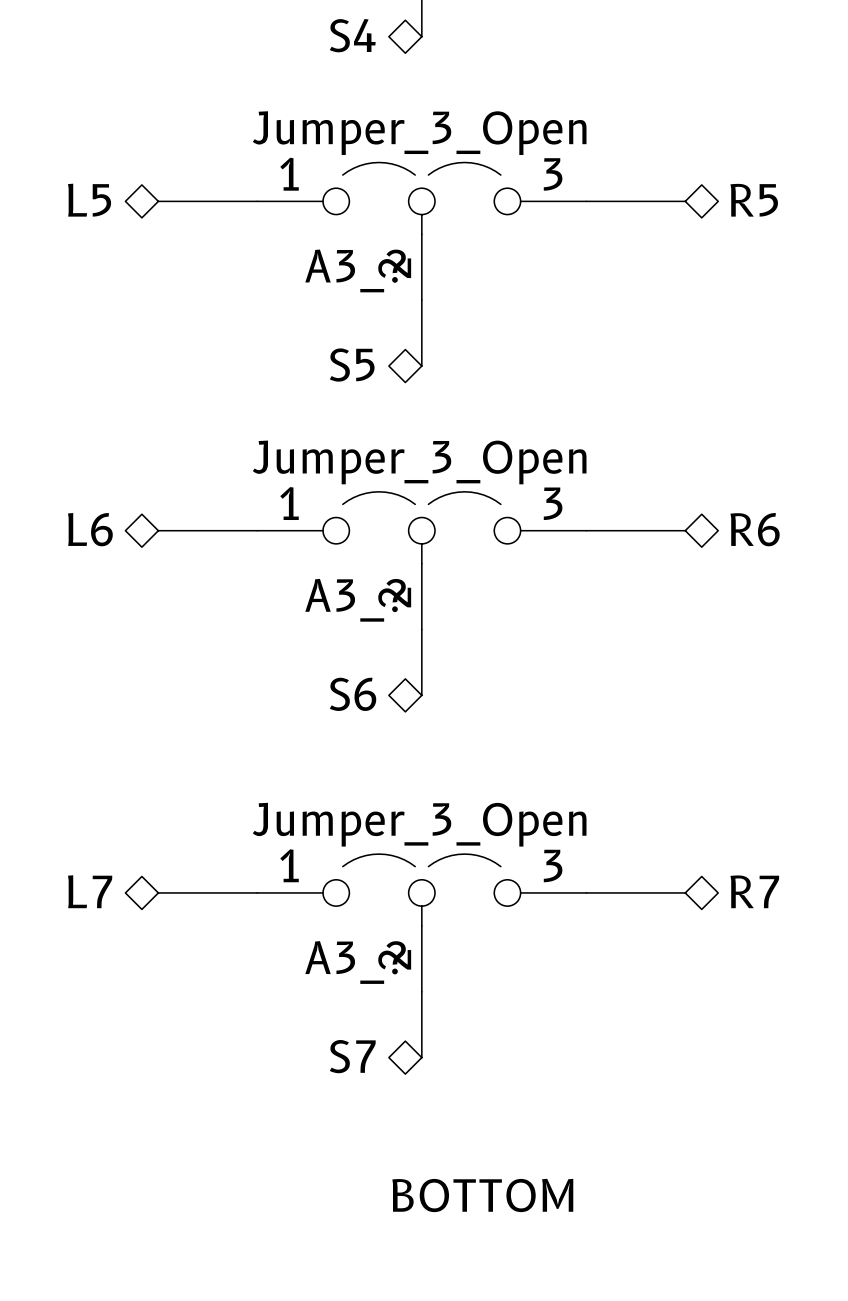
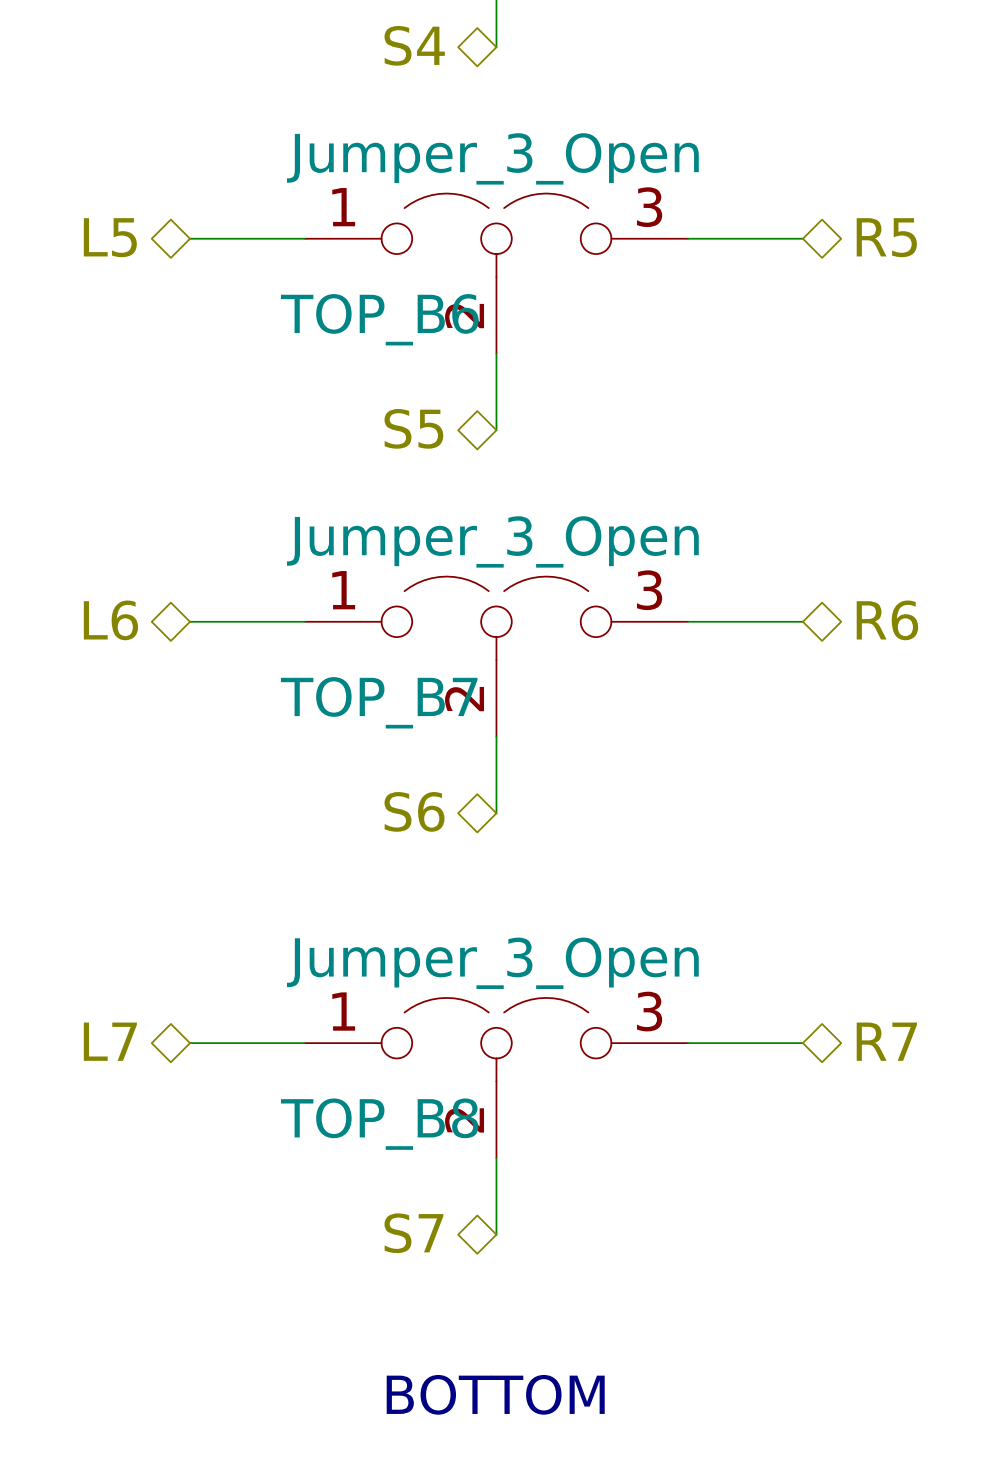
A3_? name: A3_? (355, 270) -> TOP_B6 (379, 319)
A3_? name: A3_? (355, 600) -> TOP_B7 (379, 702)
A3_? name: A3_? (355, 962) -> TOP_B8 (379, 1124)
text position: BOTTOM (482, 1195) -> BOTTOM (495, 1394)

